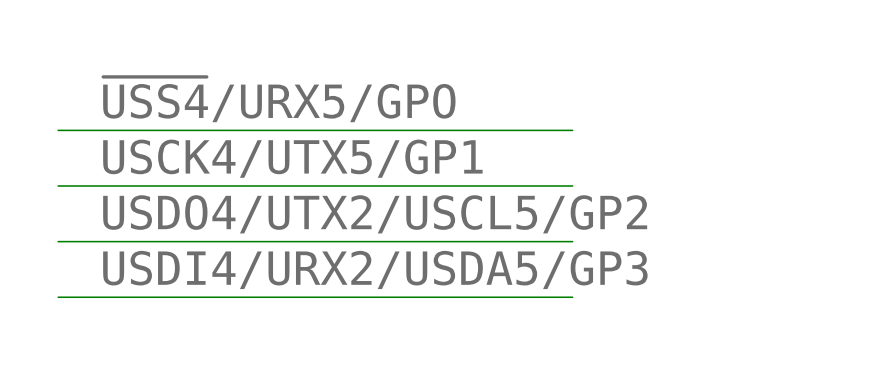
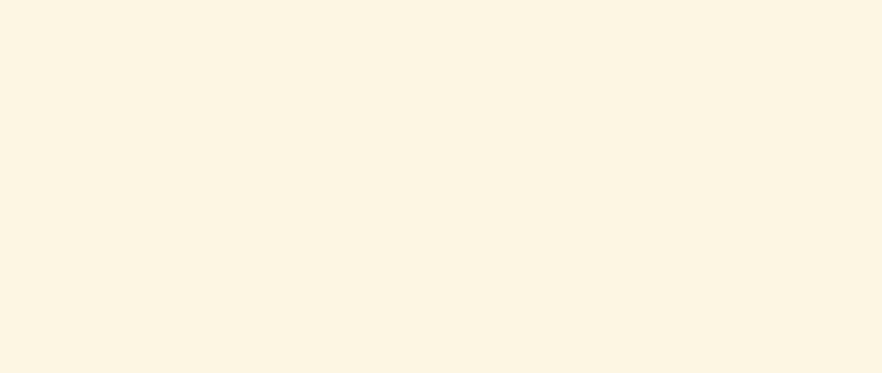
label: ~{USS4}/URX5/GPO (279, 99) -> none
wire: (58, 130) (572, 130) -> none
label: USCK4/UTX5/GP1 (292, 158) -> none
wire: (58, 186) (572, 186) -> none
label: USDO4/UTX2/USCL5/GP2 (375, 214) -> none
wire: (58, 241) (572, 241) -> none
label: USDI4/URX2/USDA5/GP3 (375, 269) -> none
wire: (58, 297) (572, 297) -> none

